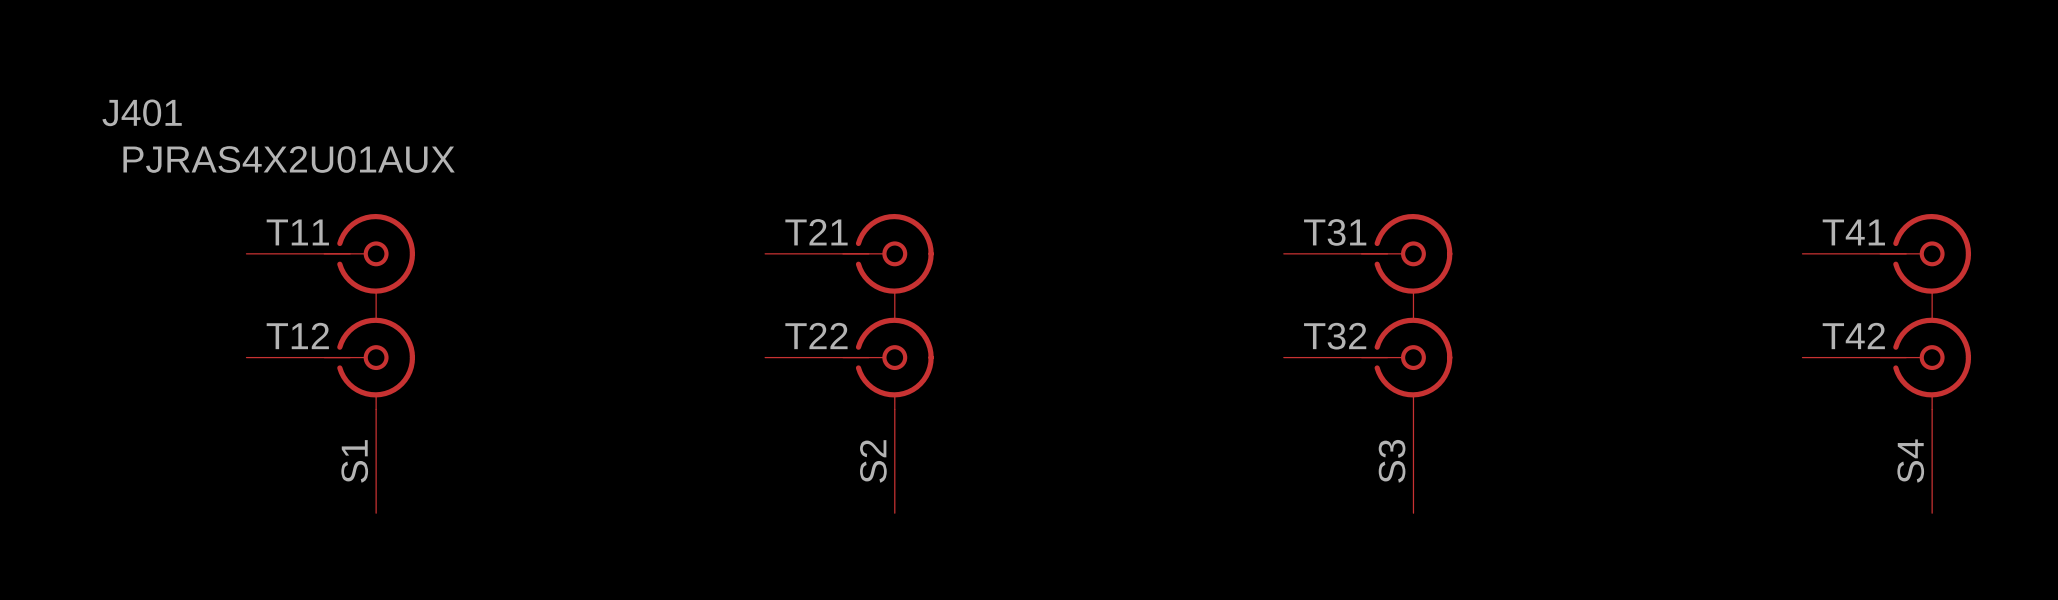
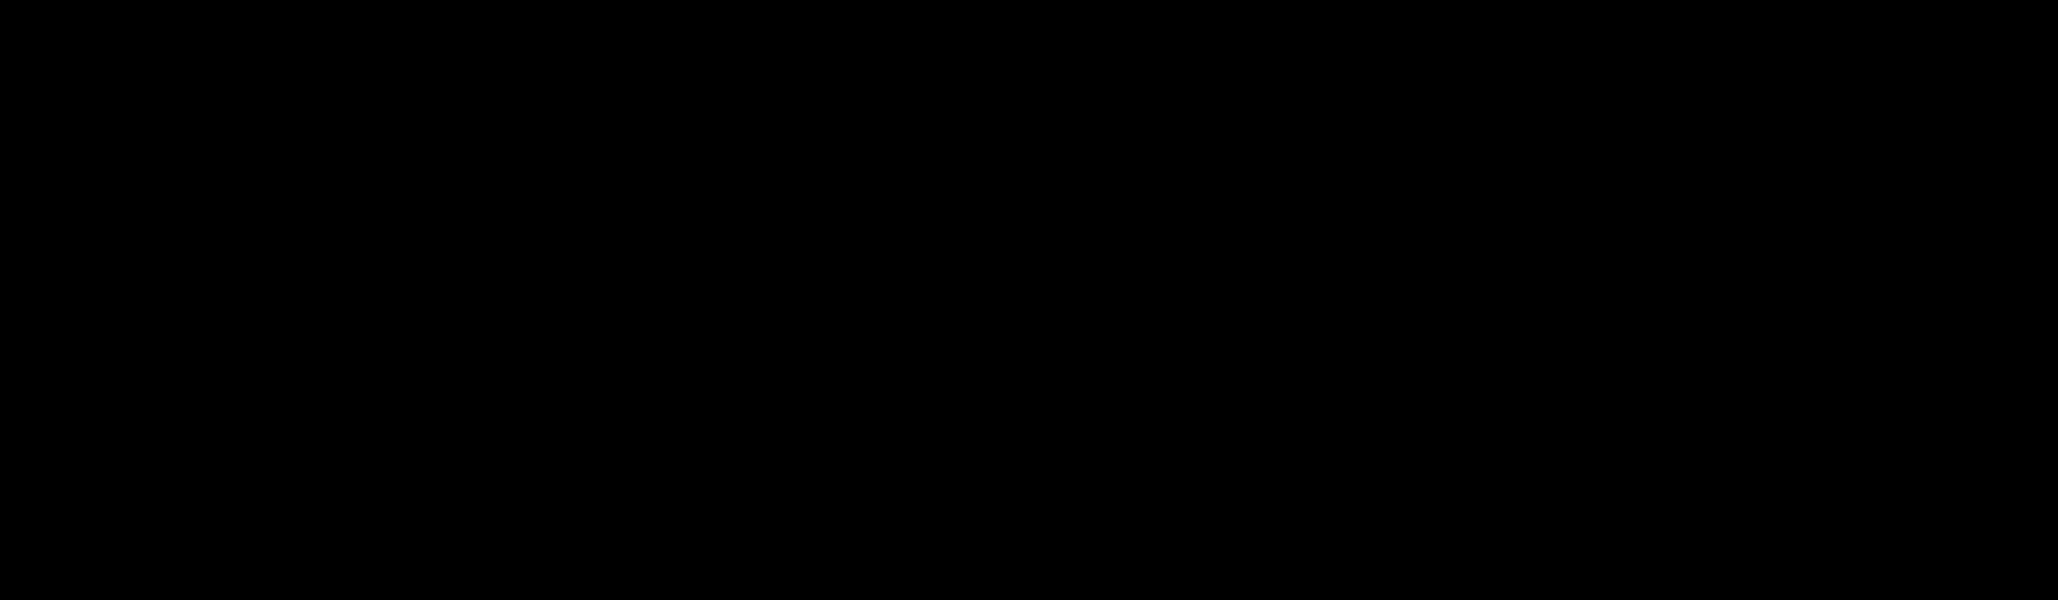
J401: PJRAS4X2U01AUX (1108, 363) -> none

